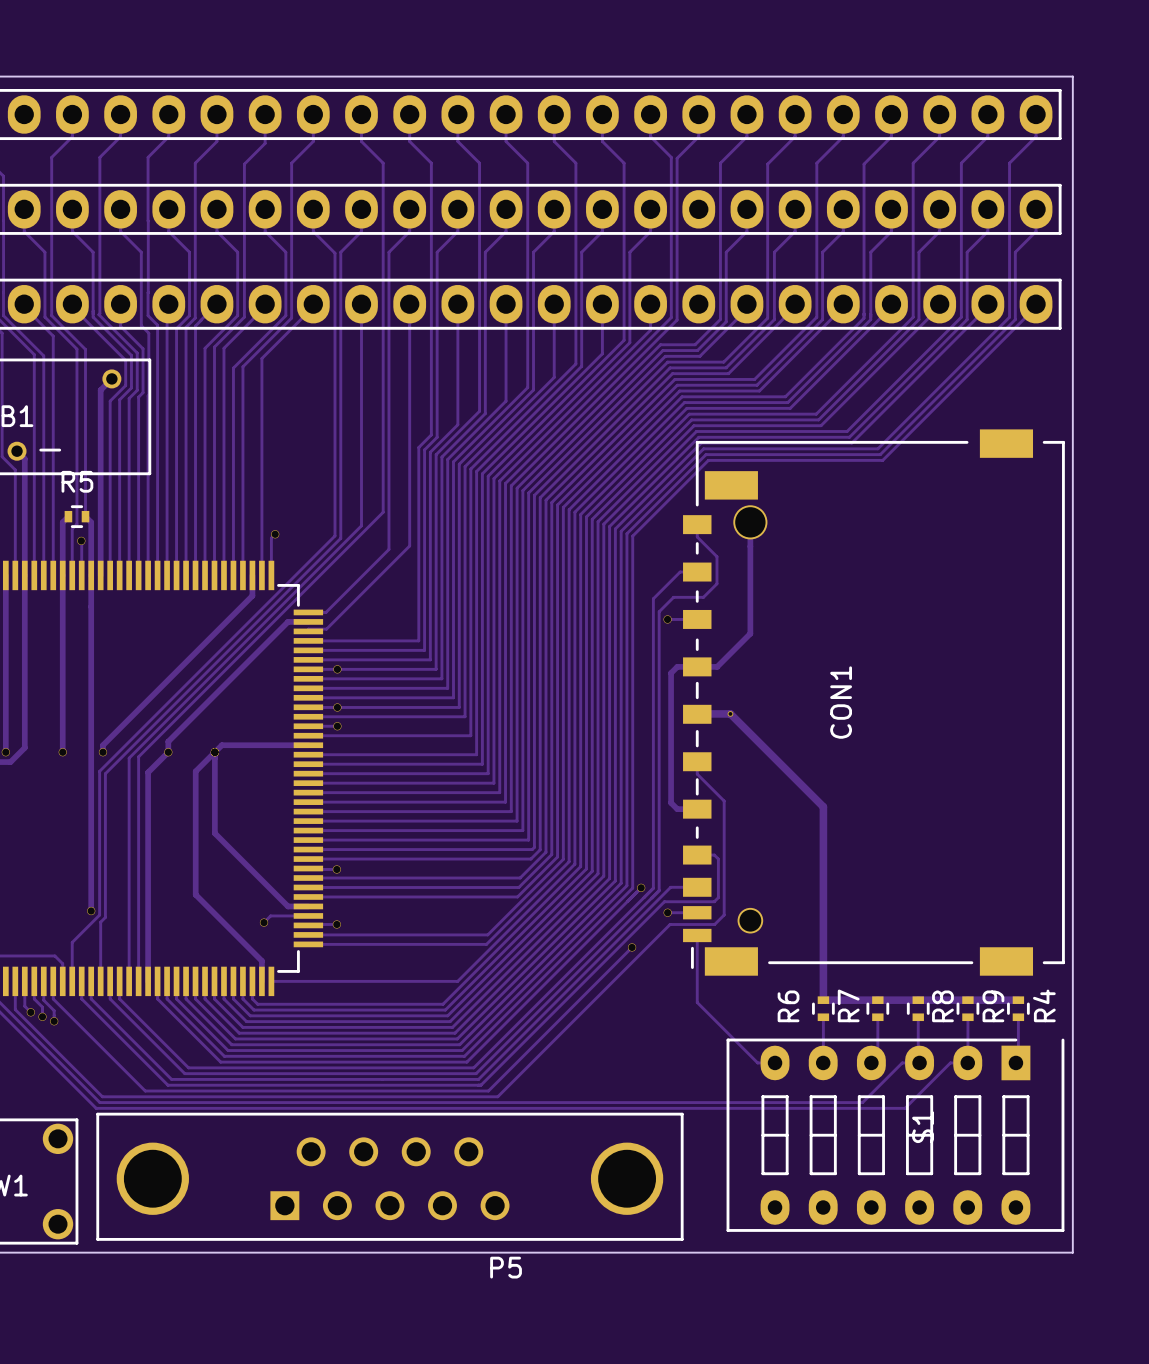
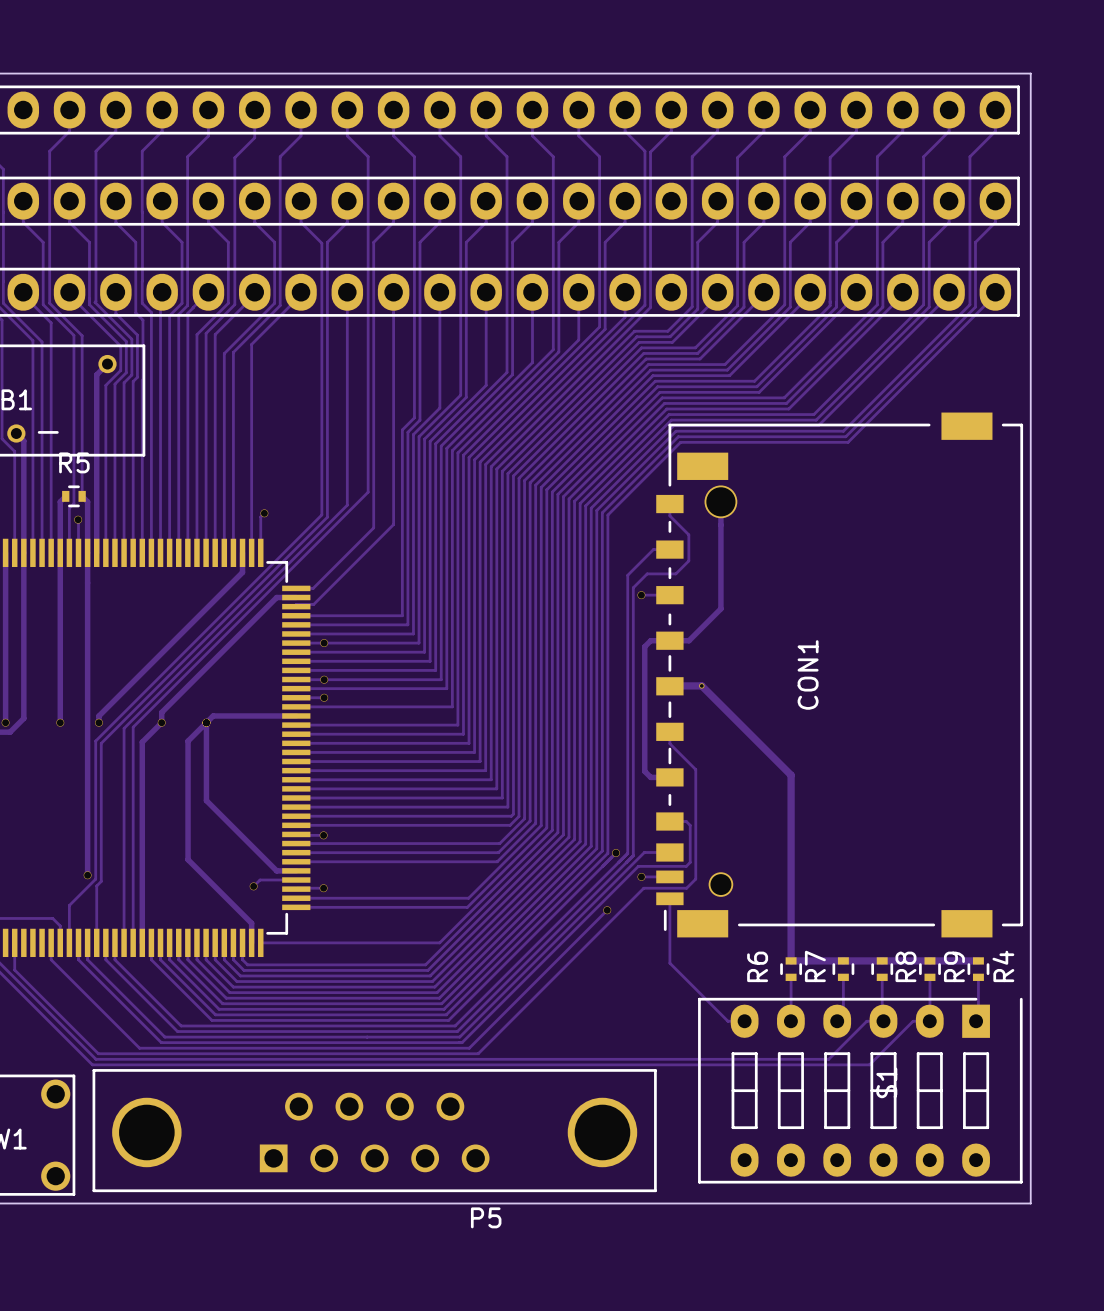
track: (24, 981) (24, 1006) (30, 1012) -> none
track: (34, 981) (34, 998) (42, 1007) (42, 1016) -> none
track: (43, 981) (43, 1000) (54, 1010) (54, 1021) -> none
via: (30, 1012) -> none
via: (42, 1016) -> none
via: (54, 1021) -> none

